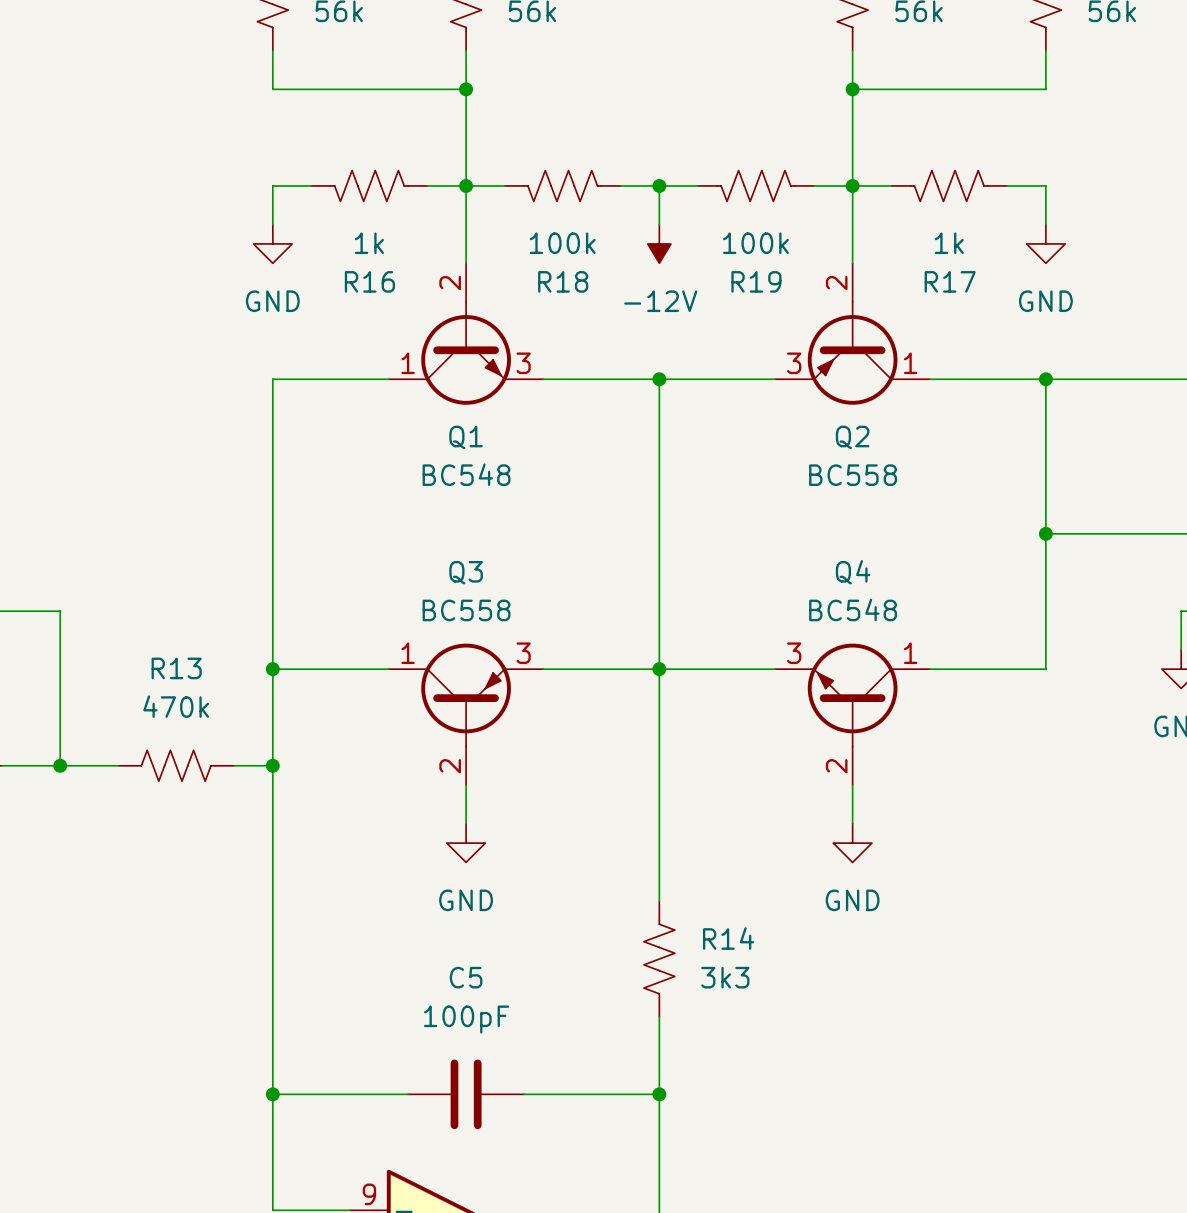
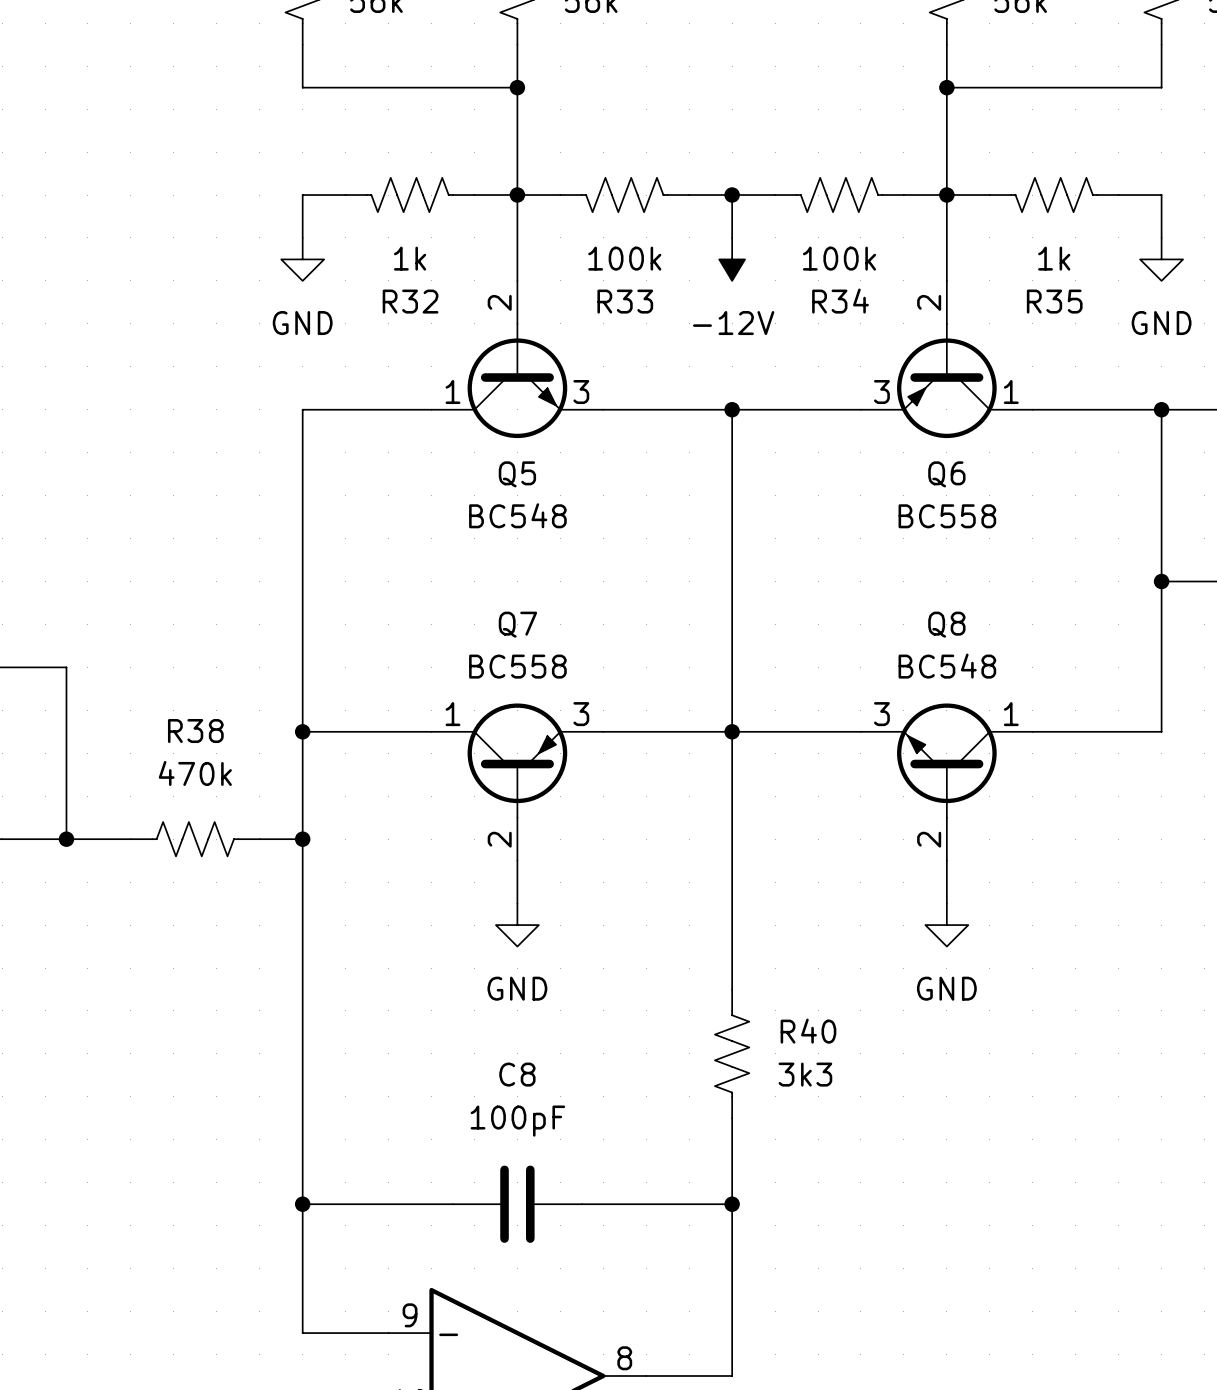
R16 name: R16 (369, 281) -> R32 (410, 301)
R18 name: R18 (563, 281) -> R33 (625, 301)
R19 name: R19 (756, 281) -> R34 (840, 301)
R17 name: R17 (950, 281) -> R35 (1054, 301)
Q1 name: Q1 (466, 437) -> Q5 (517, 474)
Q2 name: Q2 (852, 437) -> Q6 (946, 474)
Q3 name: Q3 (466, 572) -> Q7 (517, 624)
Q4 name: Q4 (853, 572) -> Q8 (946, 624)
R13 name: R13 (176, 668) -> R38 (195, 731)
R14 name: R14 (728, 938) -> R40 (808, 1031)
C5 name: C5 (466, 977) -> C8 (517, 1074)

